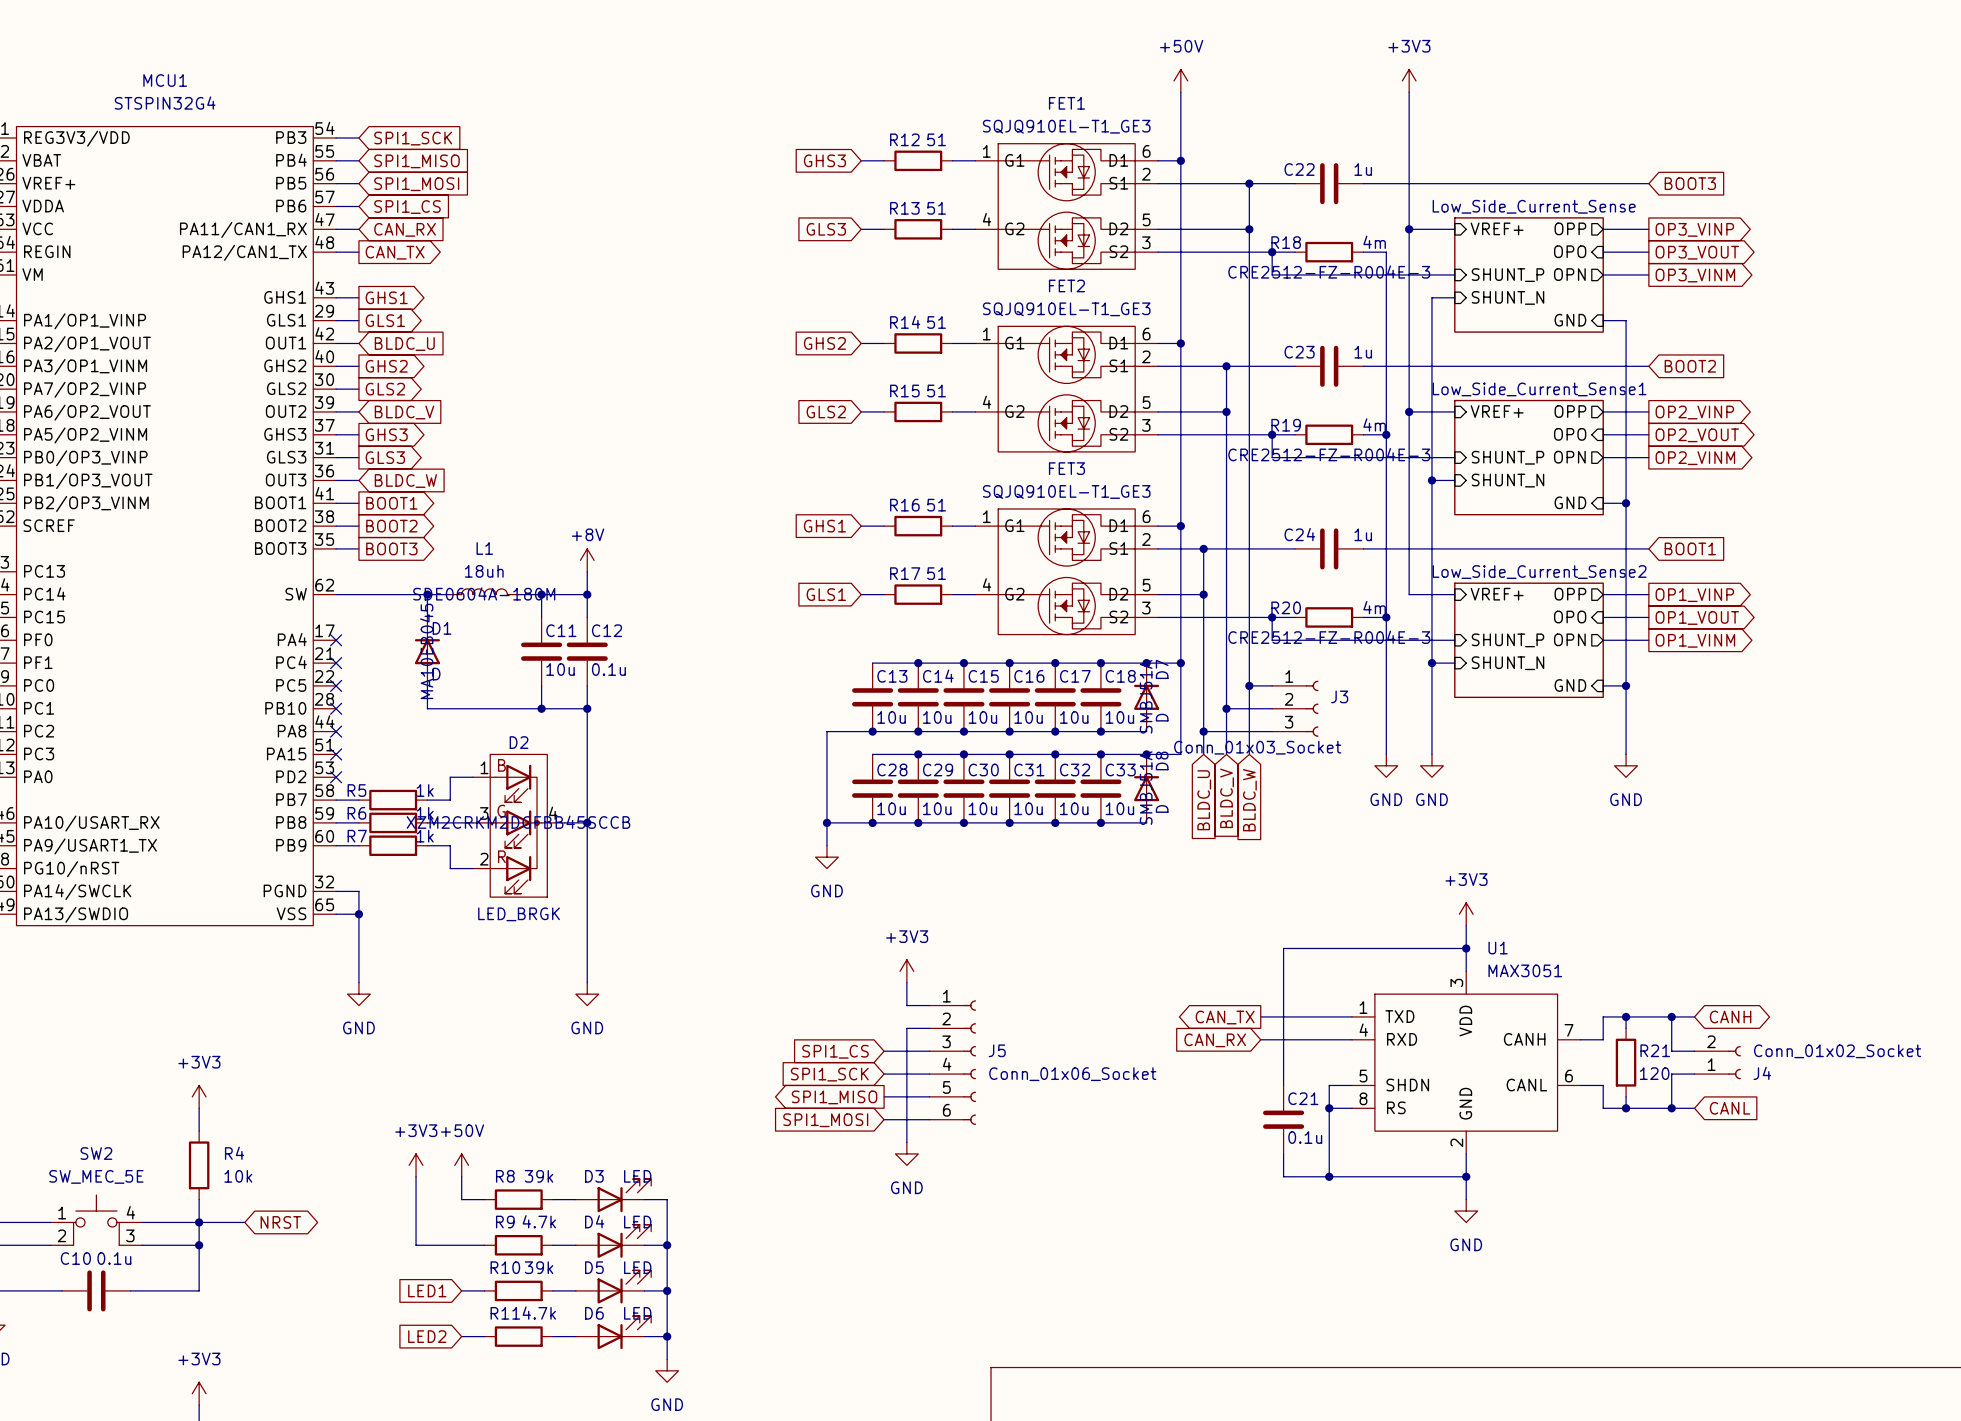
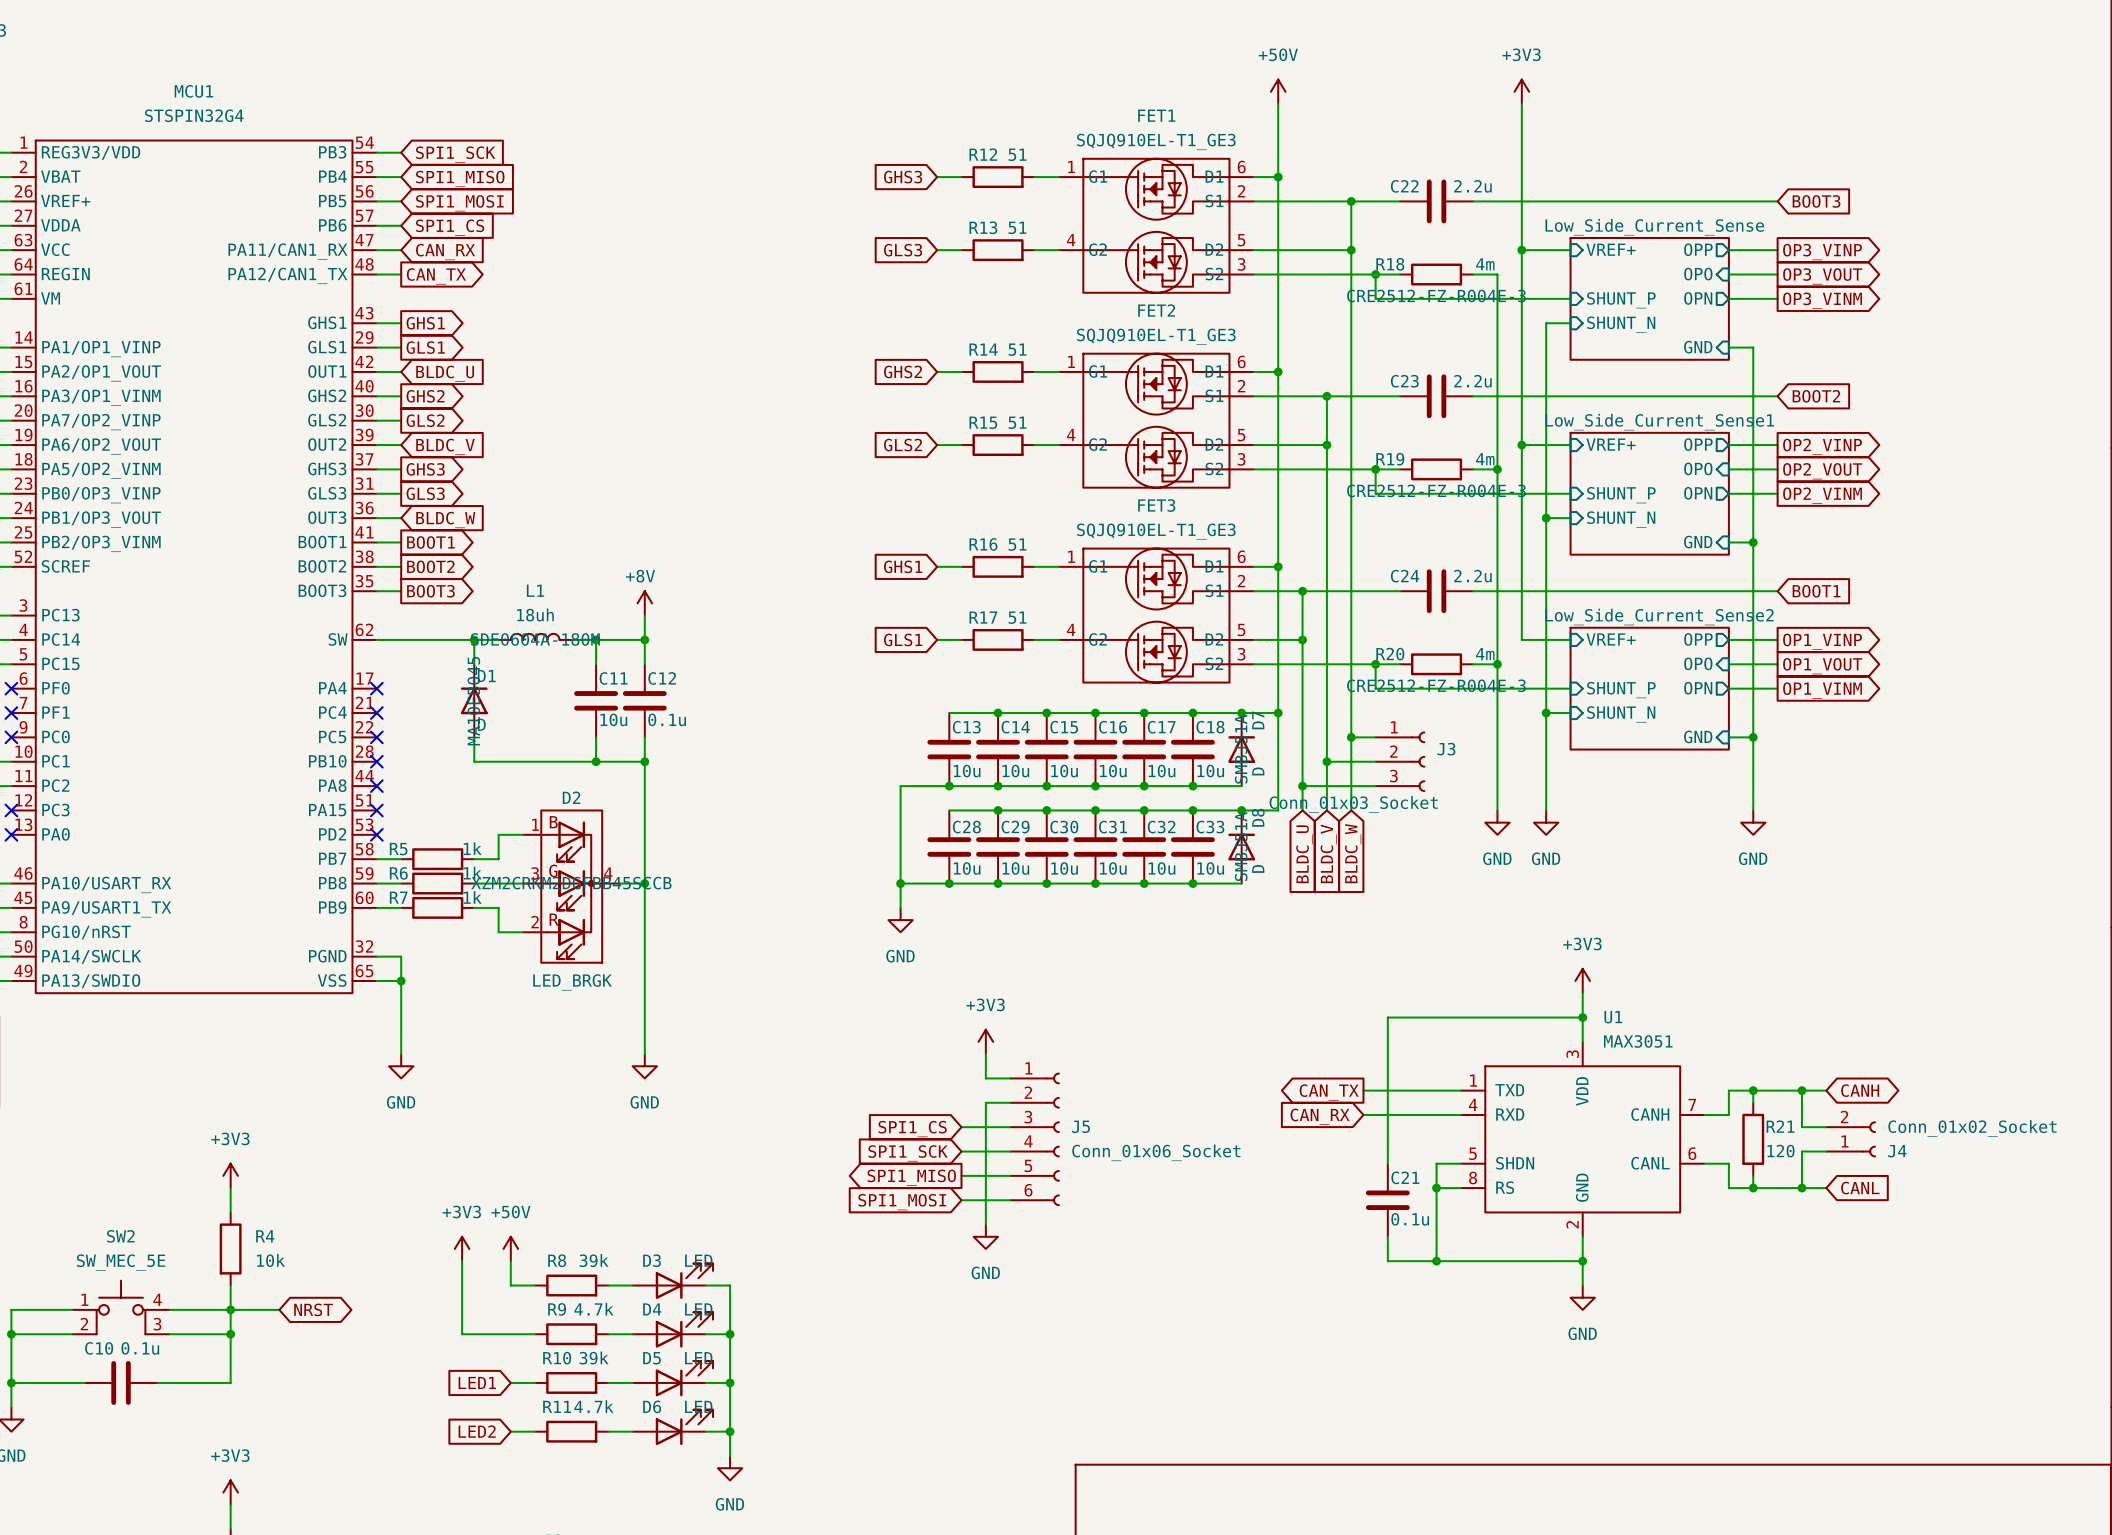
C22 value: 1u (1363, 169) -> 2.2u (1472, 186)
C23 value: 1u (1363, 352) -> 2.2u (1472, 381)
C24 value: 1u (1363, 534) -> 2.2u (1472, 576)

